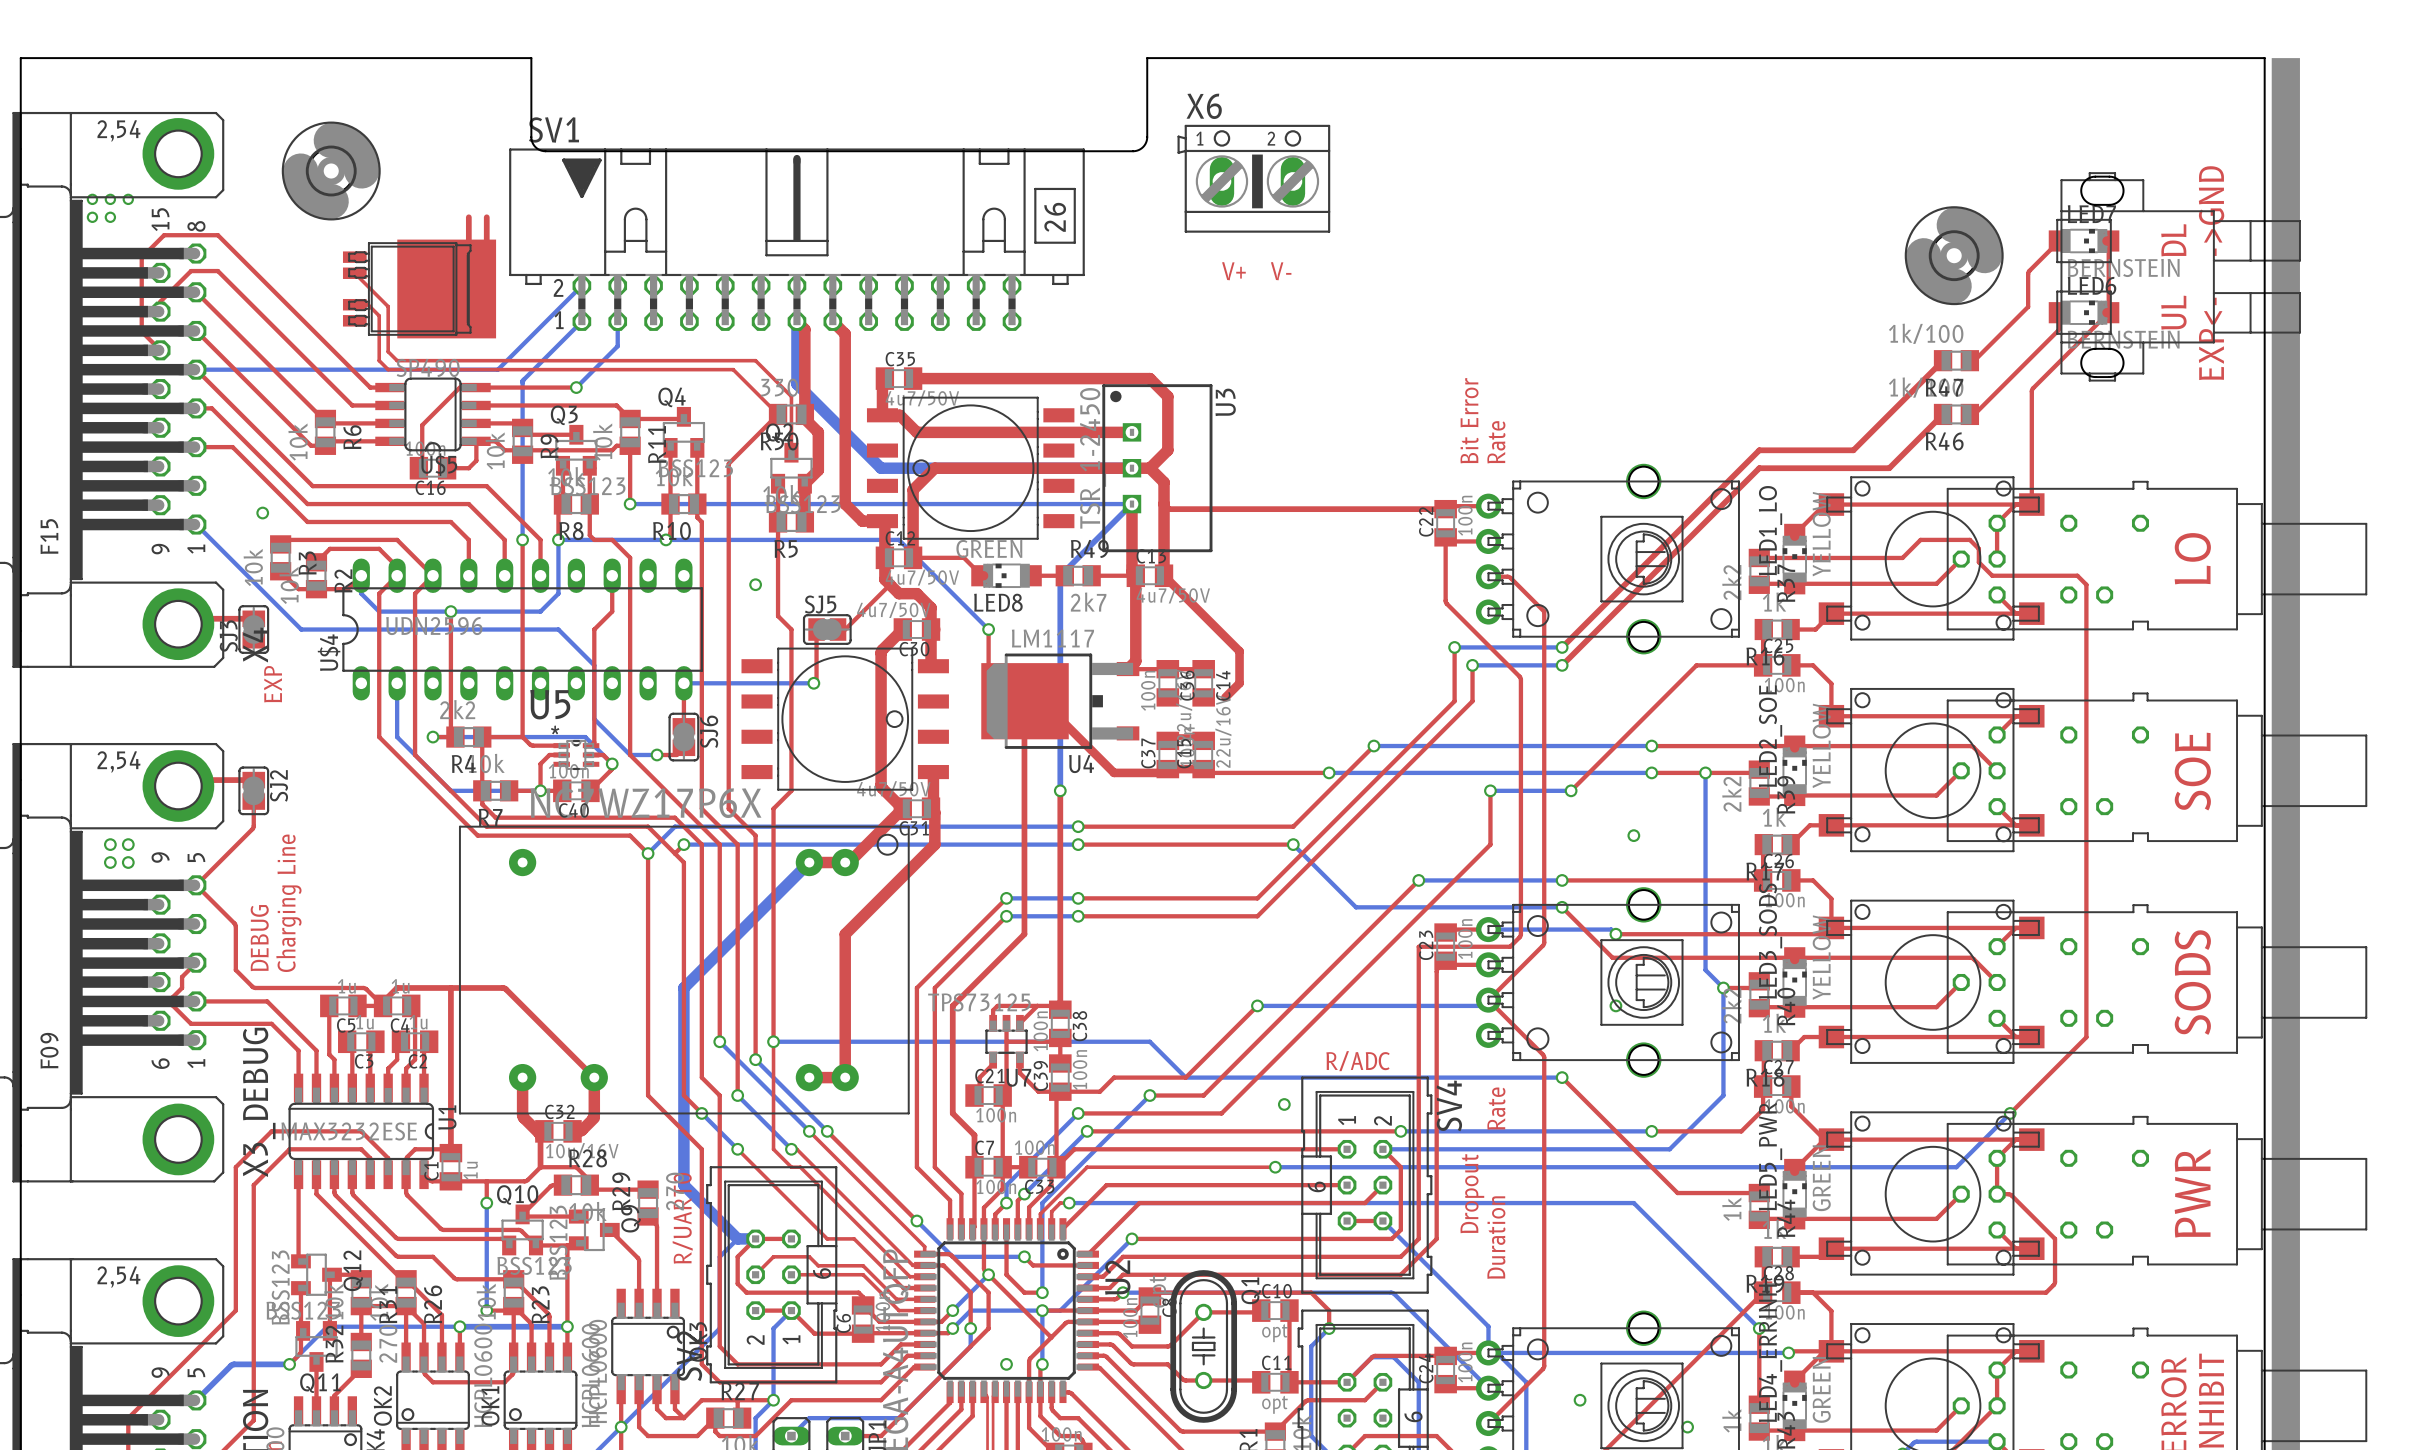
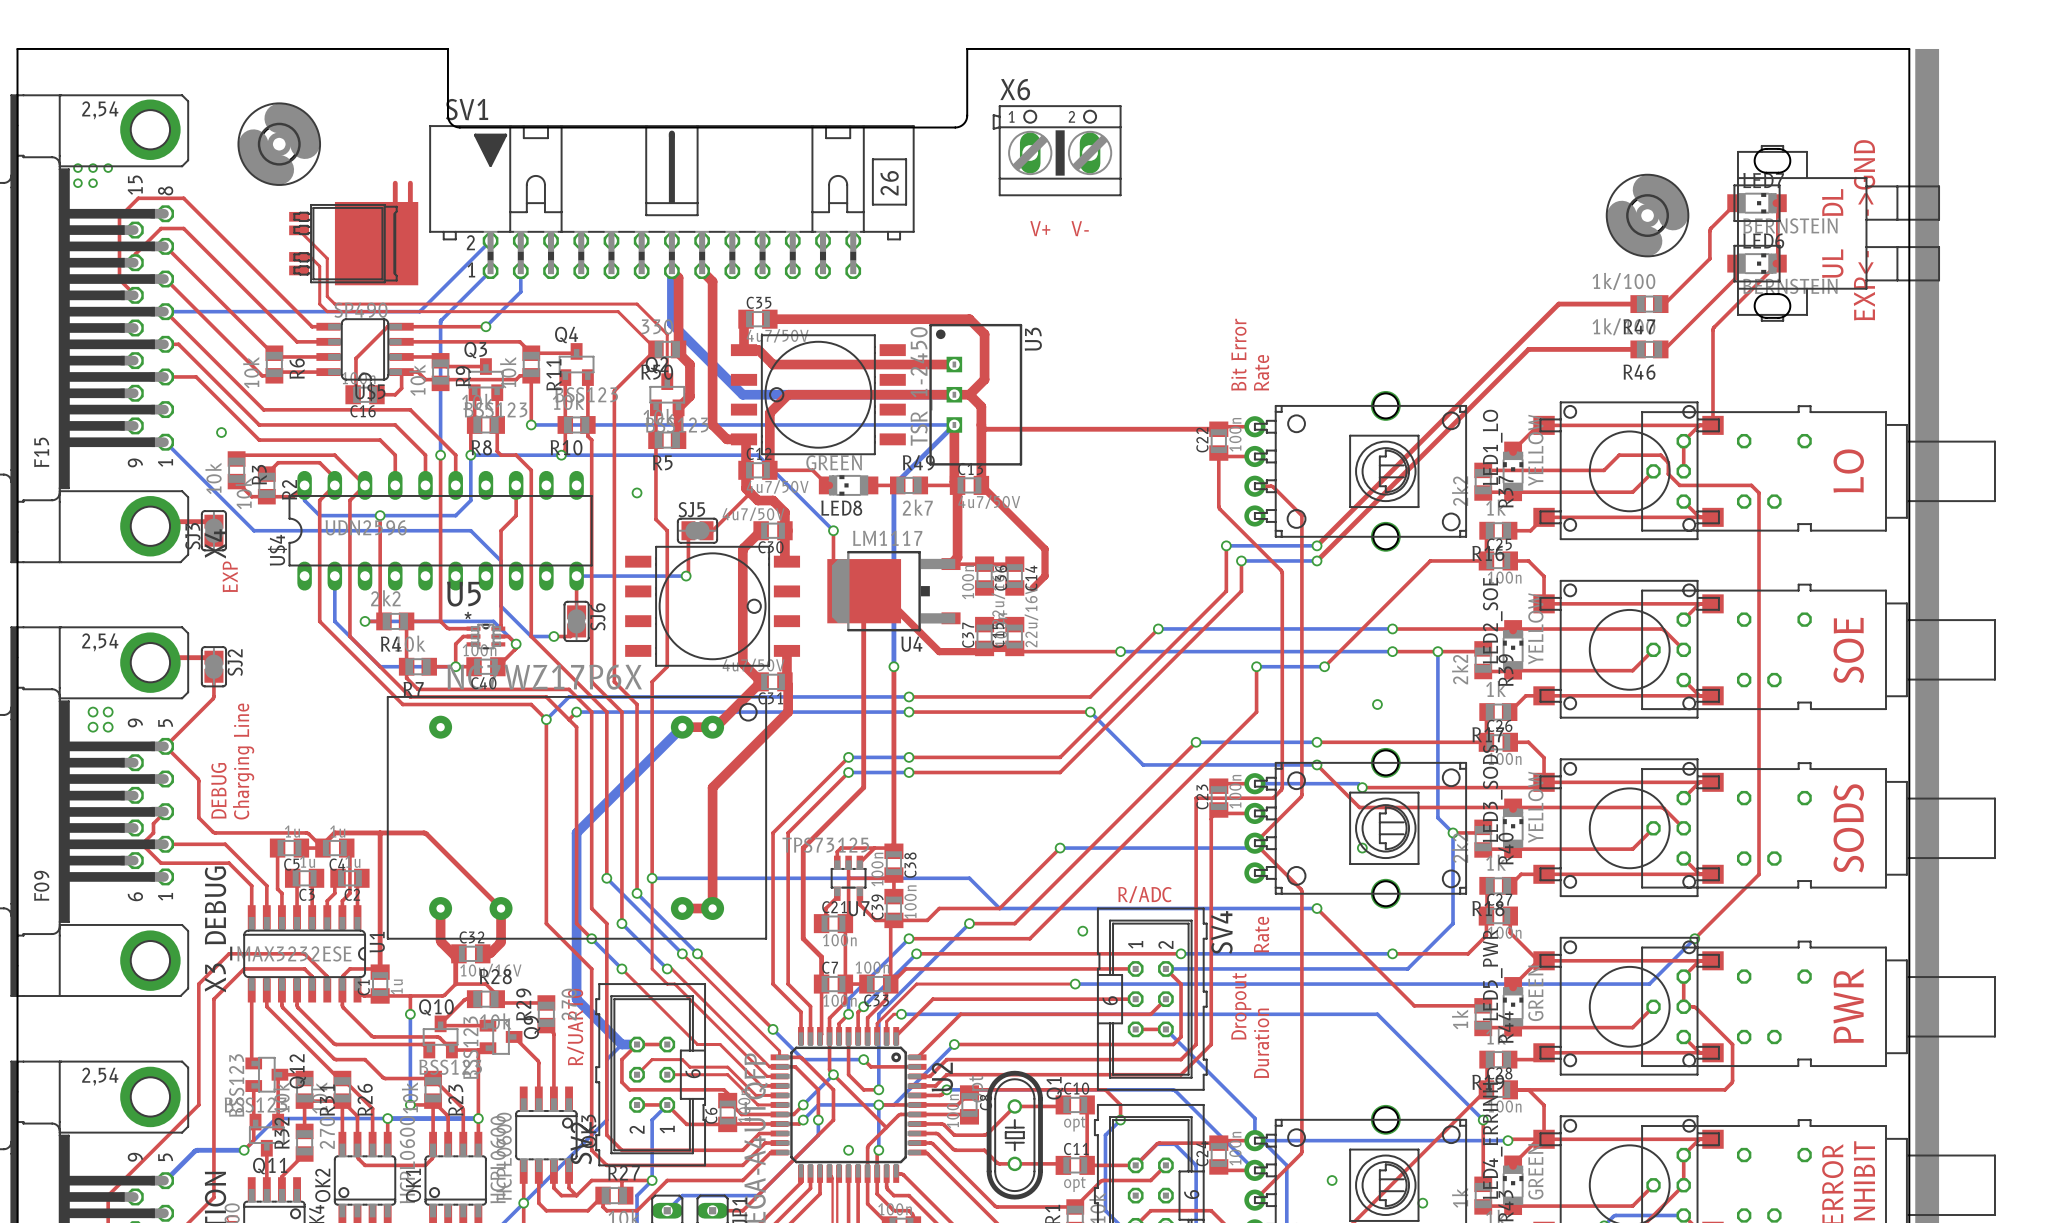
top track: (1943, 360) (1853, 450) (1759, 450) -> (1638, 304) (1558, 304) (1483, 379)
top track: (1943, 414) (1889, 468) (1759, 468) -> (1638, 349) (1528, 349) (1483, 394)

